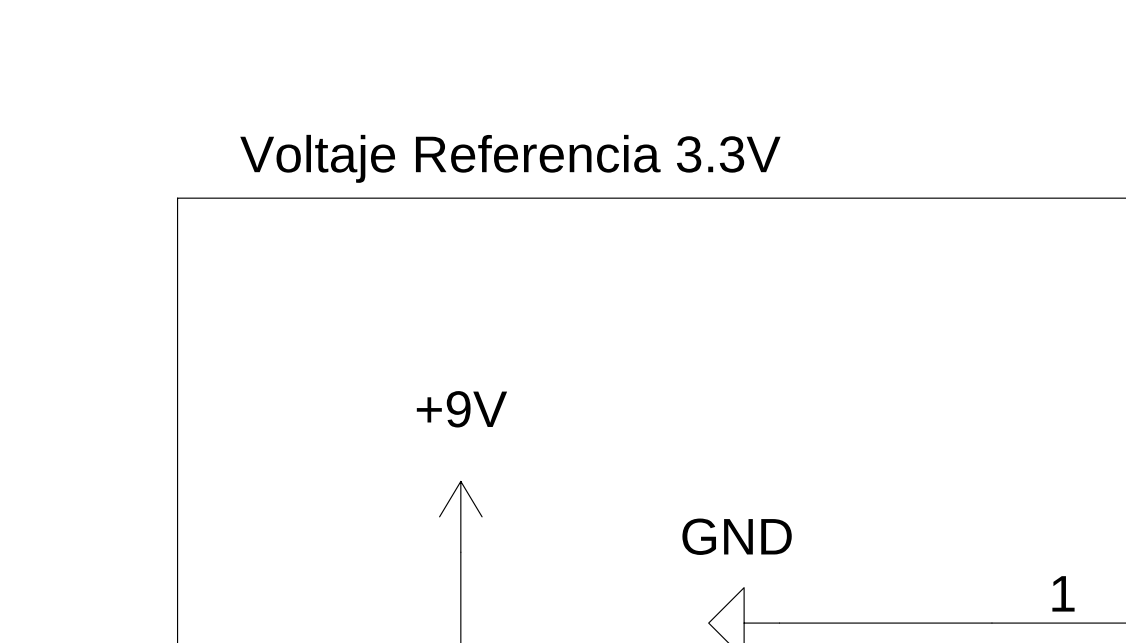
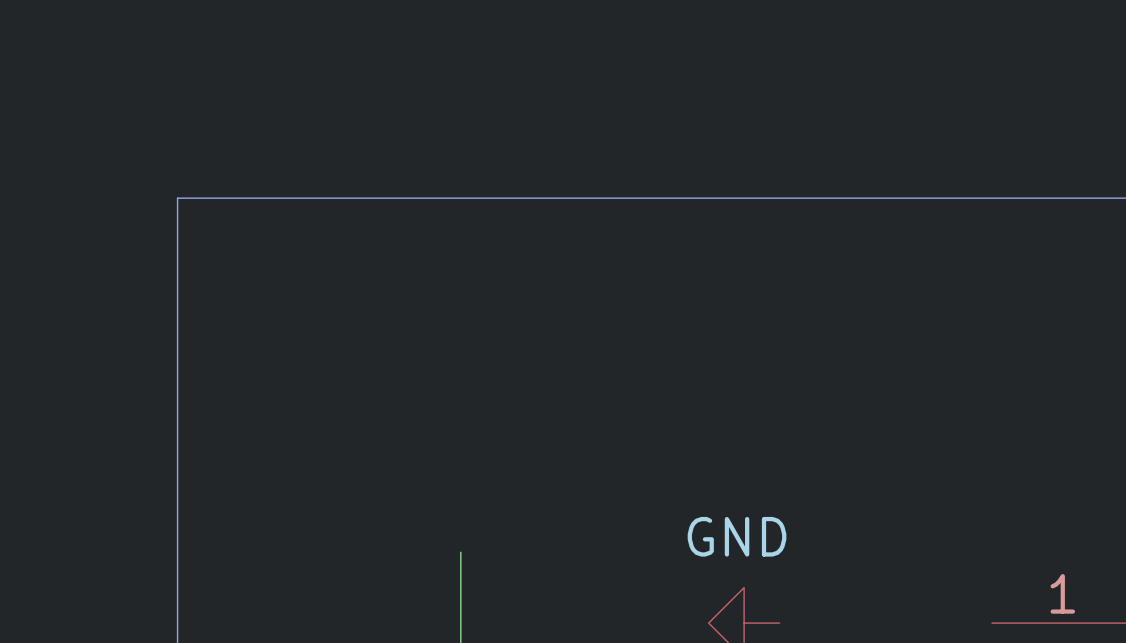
text: Voltaje Referencia 3.3V (510, 158) -> none
power symbol: +9V (460, 516) -> none
wire: (779, 623) (991, 623) -> none

